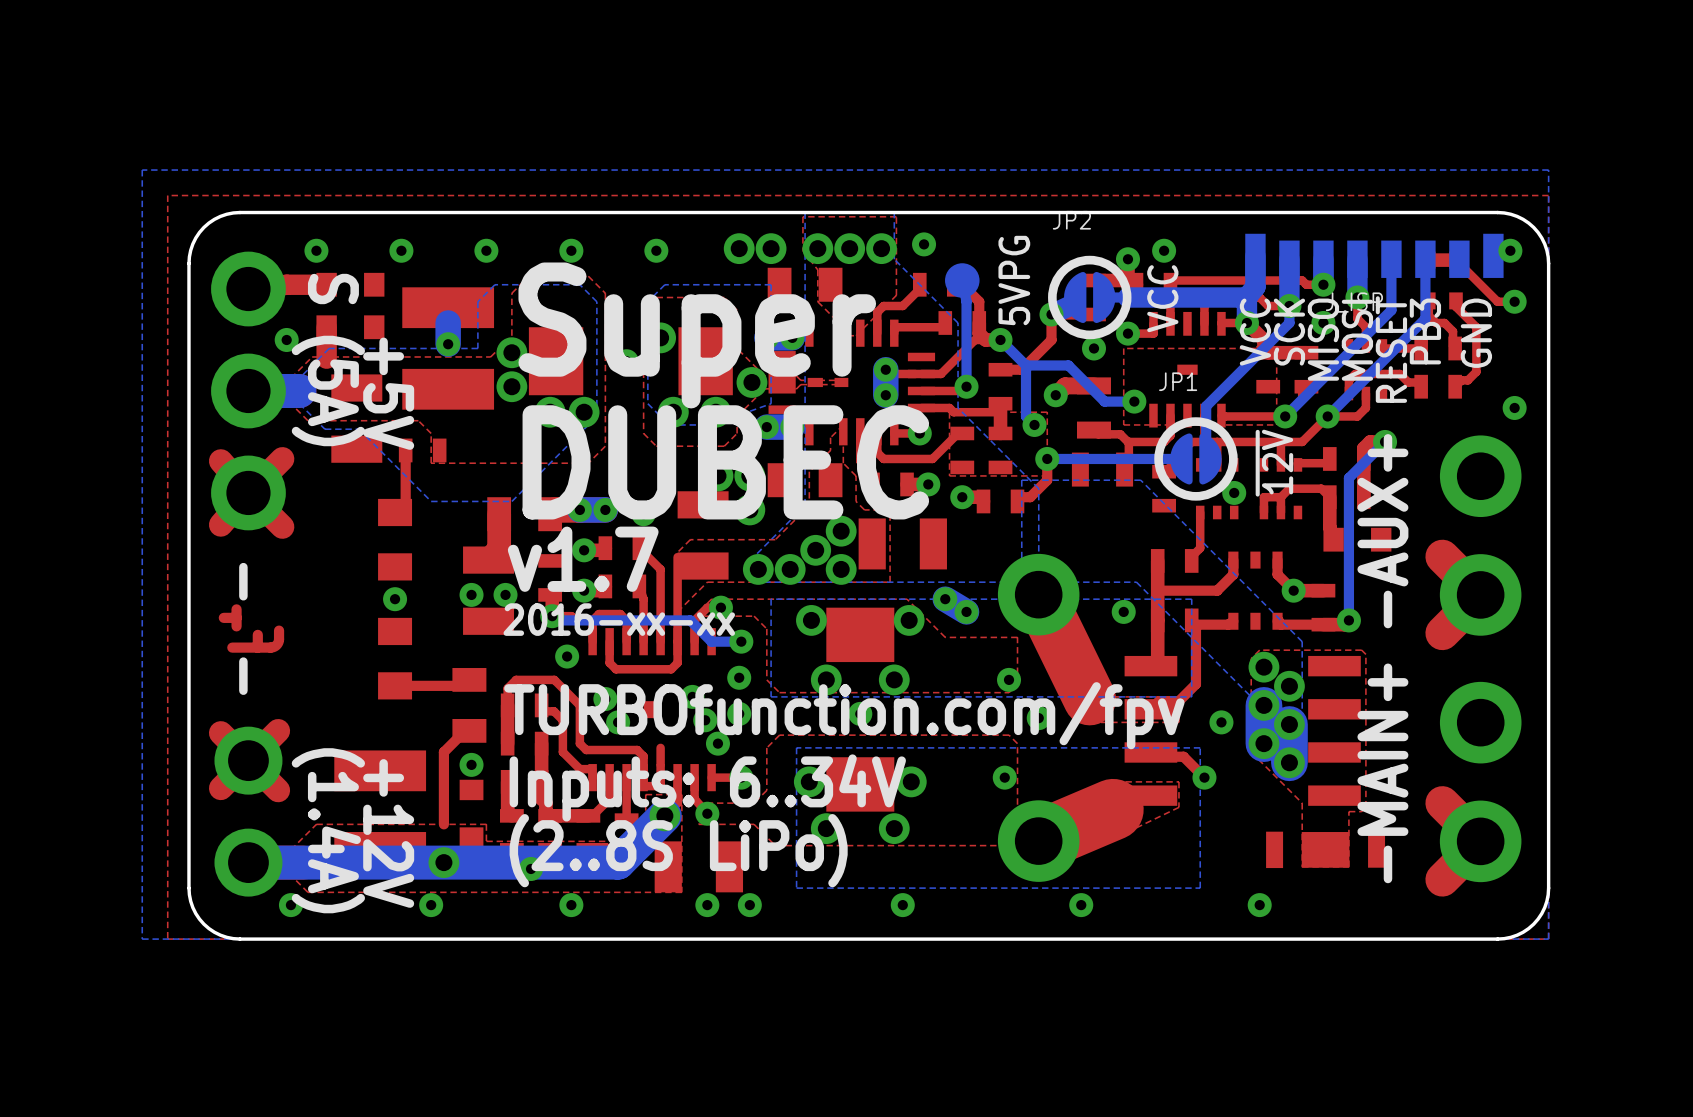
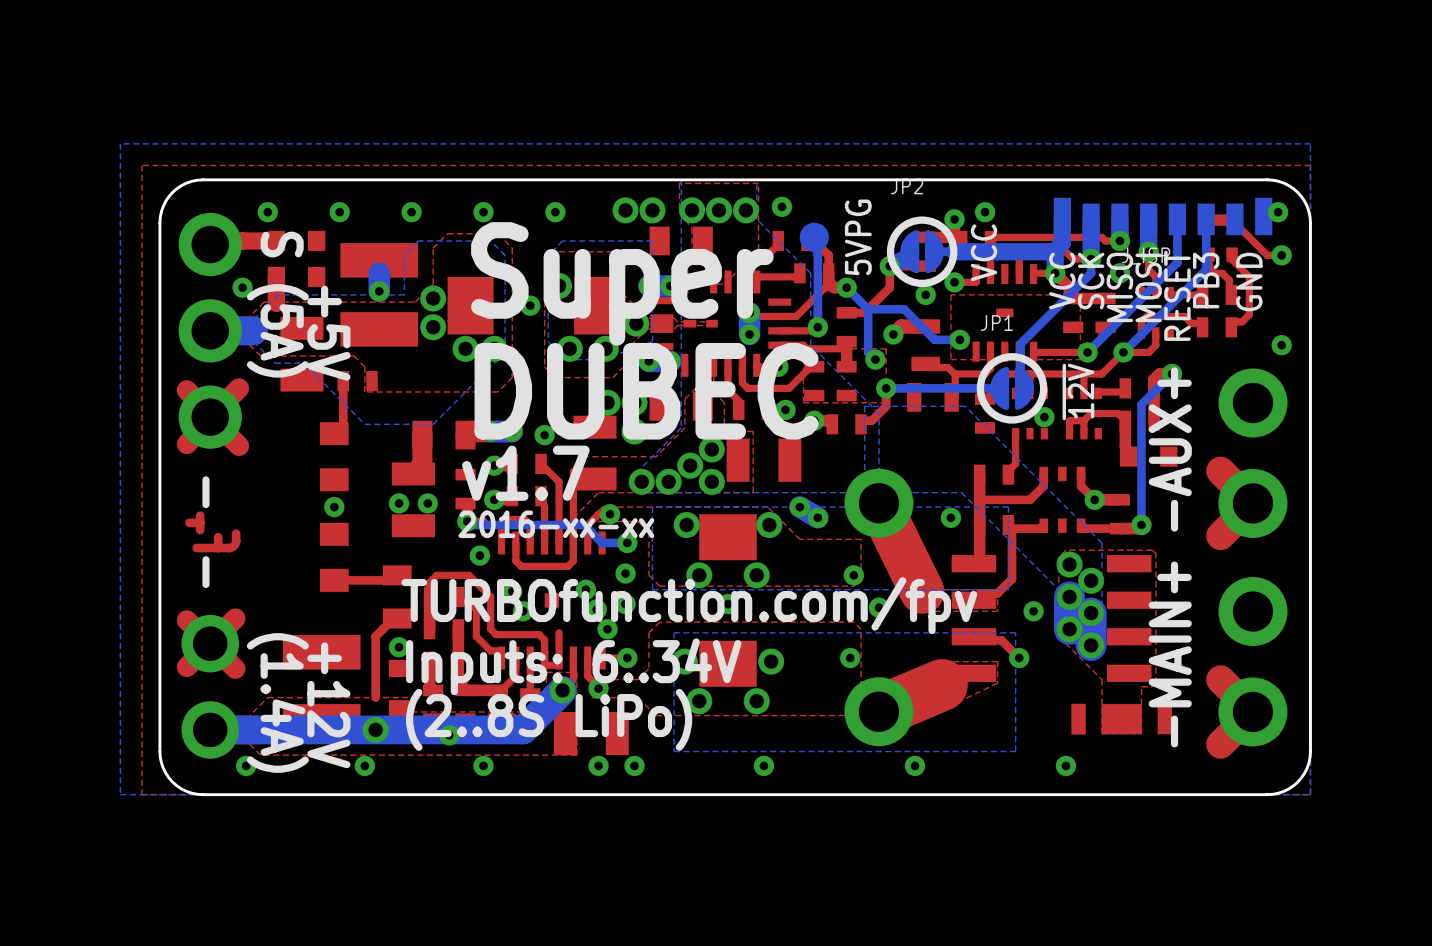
text position: Super (697, 335) -> Super (622, 283)
text position: DUBEC (725, 462) -> DUBEC (646, 391)
text position: v1.7 (583, 559) -> v1.7 (525, 473)
text position: 2016-xx-xx (619, 619) -> 2016-xx-xx (556, 524)
text position: TURBOfunction.com/fpv (844, 715) -> TURBOfunction.com/fpv (689, 605)
text position: Inputs: 6..34V (707, 787) -> Inputs: 6..34V (573, 666)
text position: (2..8S LiPo) (678, 850) -> (2..8S LiPo) (549, 719)

